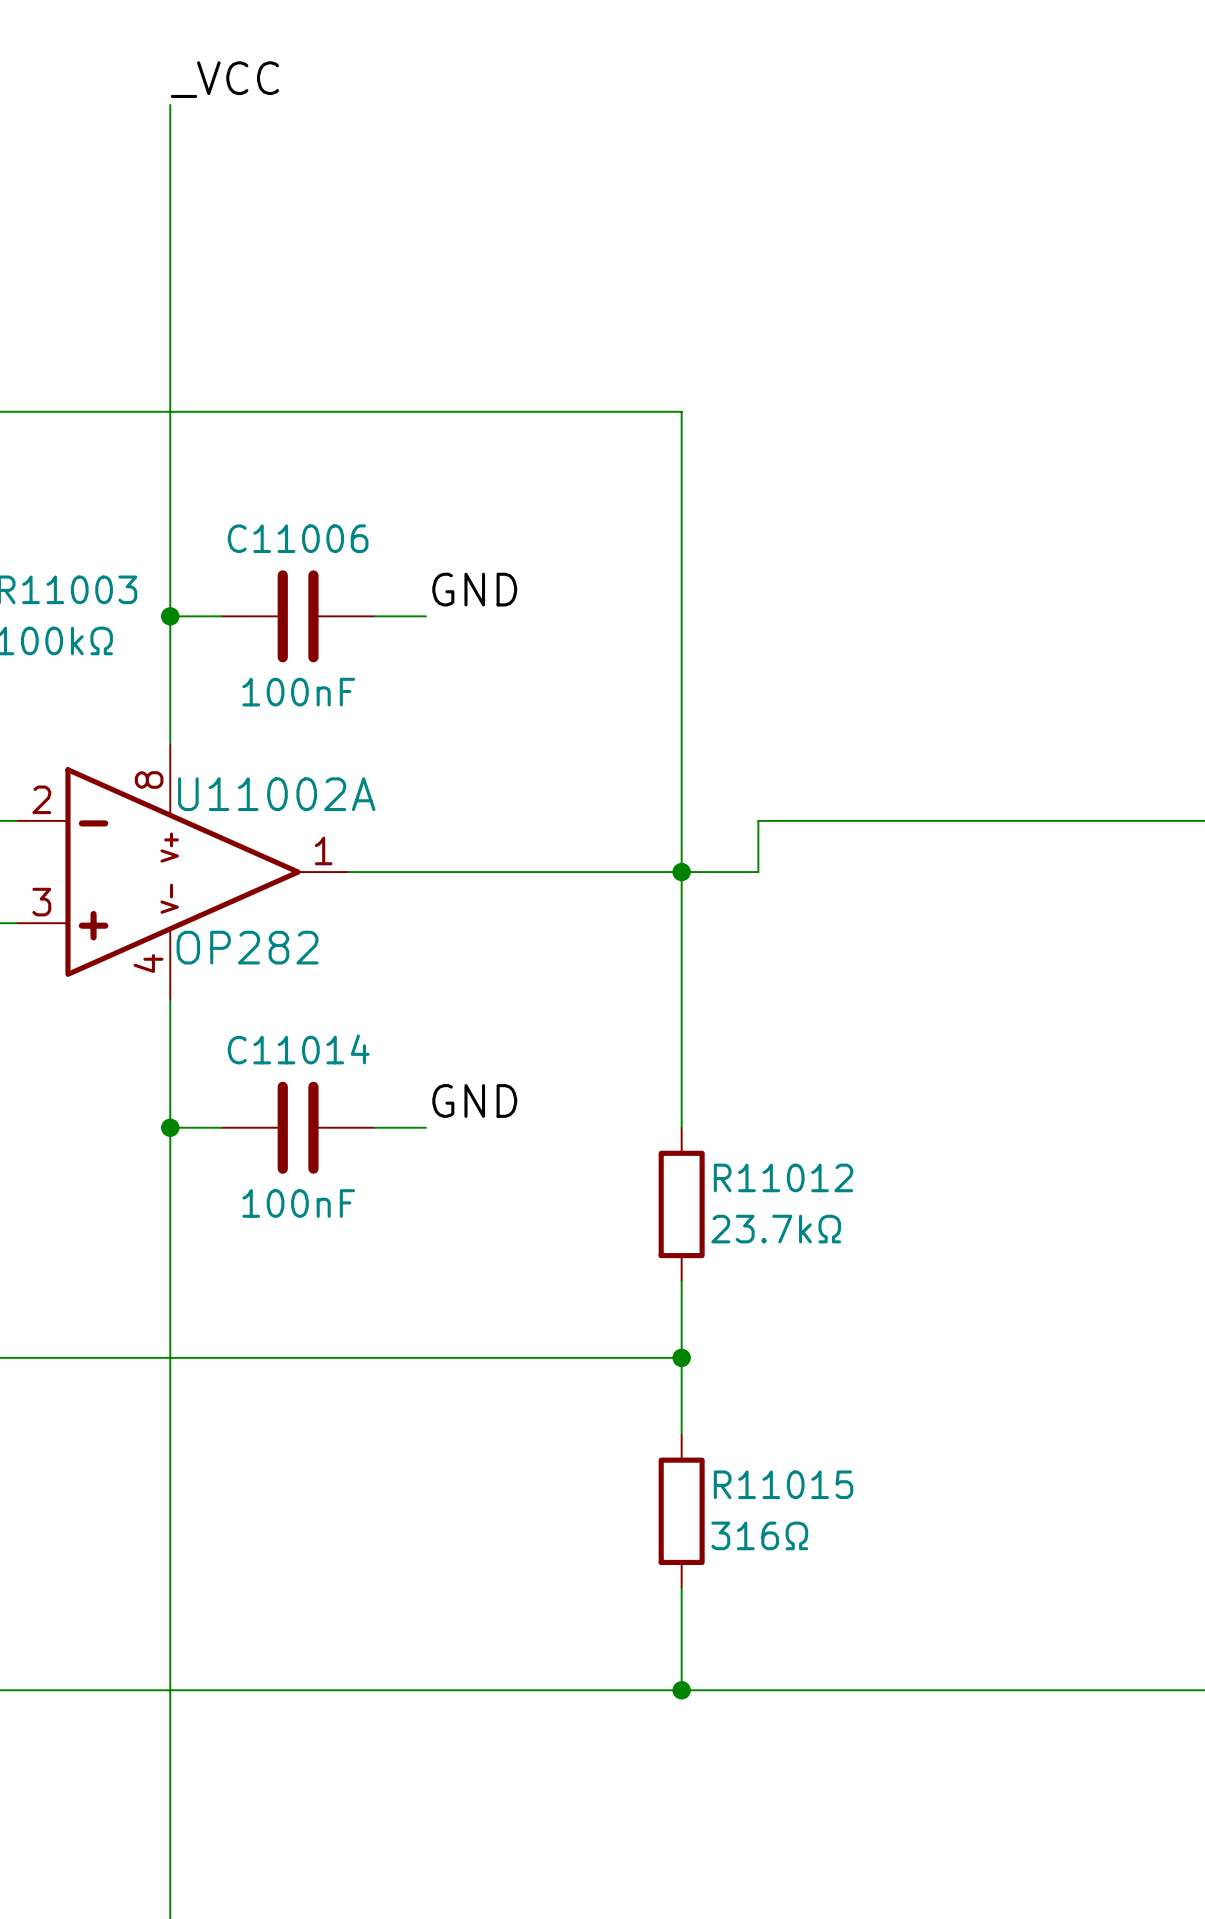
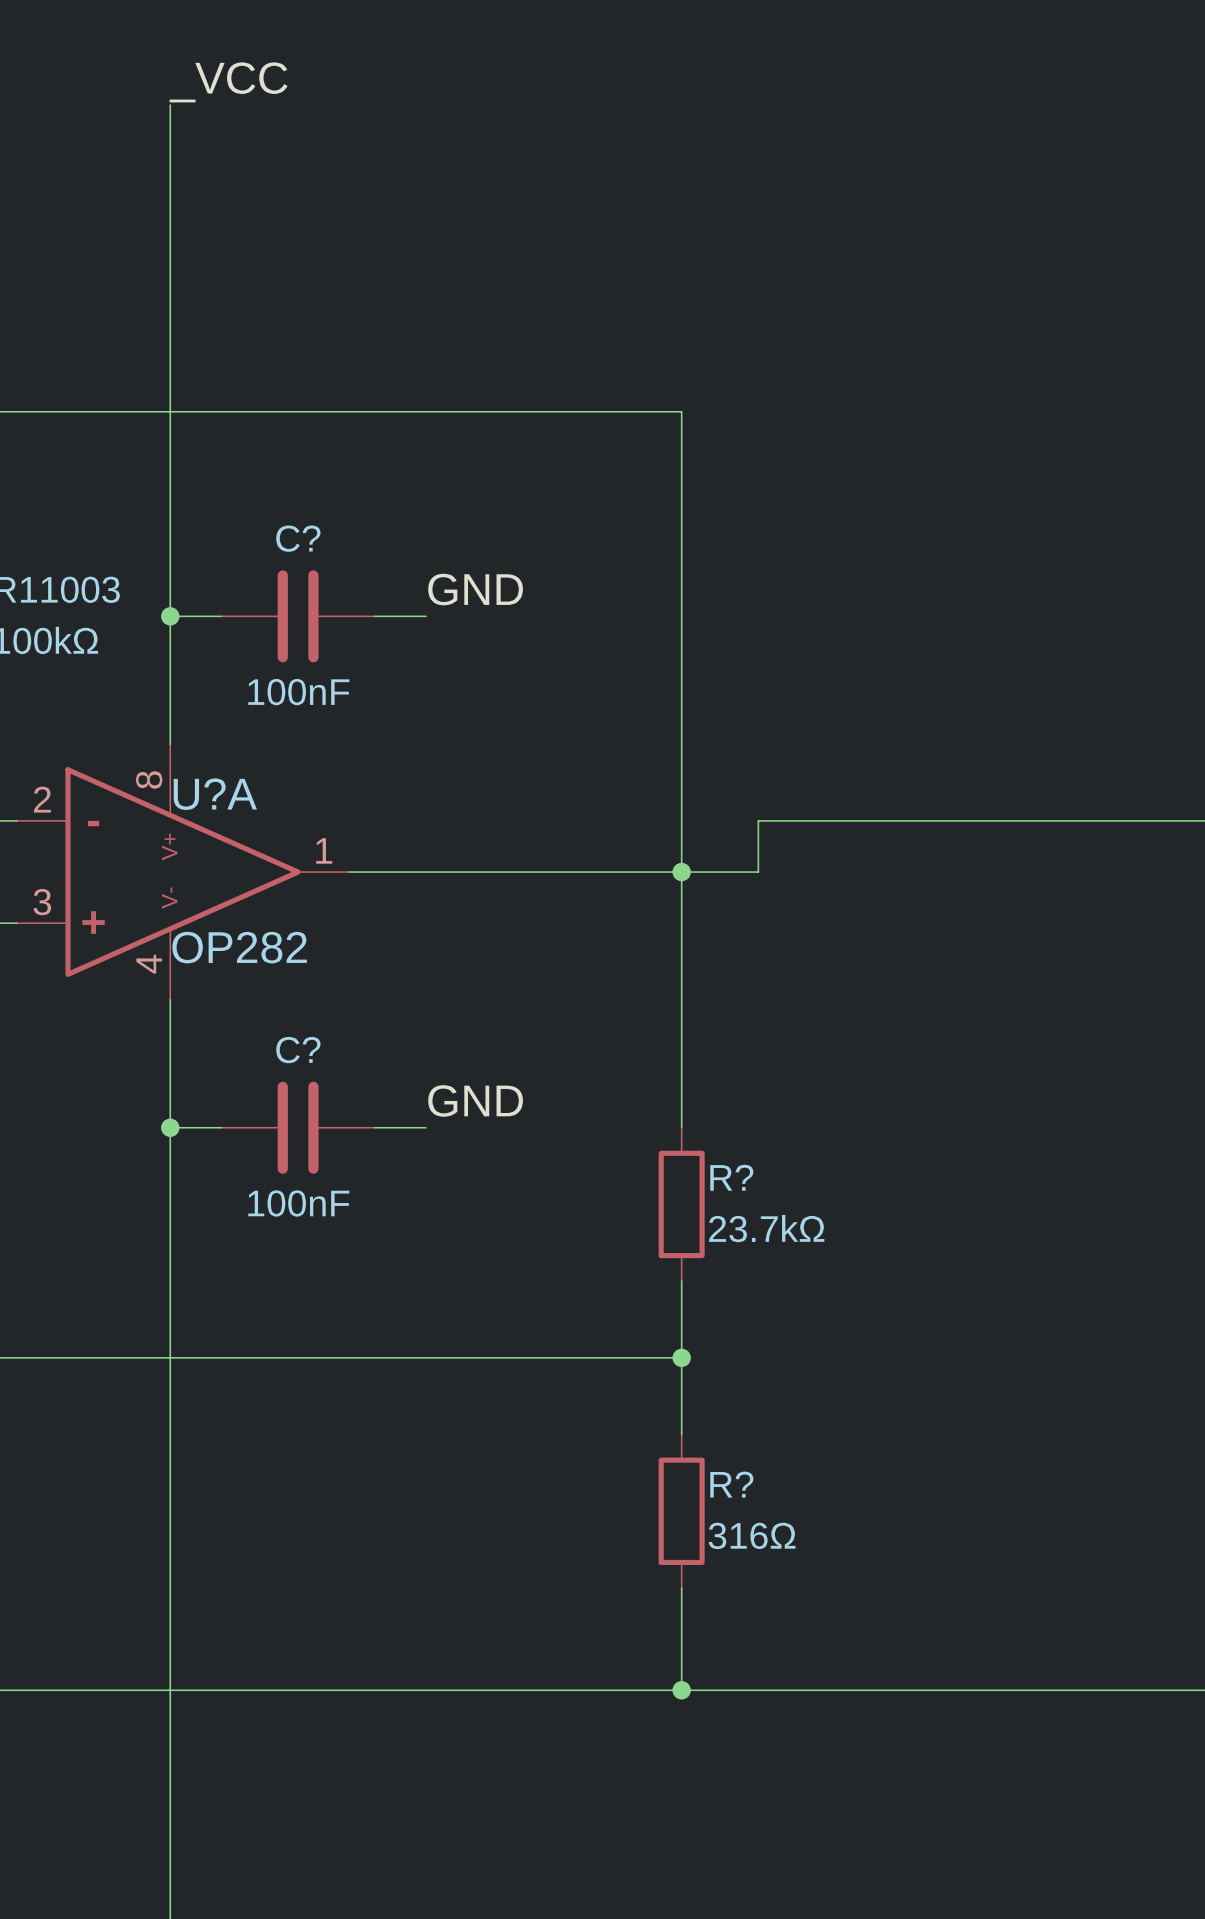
C11006 name: C11006 (298, 538) -> C? (298, 538)
U11002A name: U11002A (276, 794) -> U?A (215, 794)
C11014 name: C11014 (298, 1049) -> C? (298, 1050)
R11012 name: R11012 (783, 1177) -> R? (731, 1177)
R11015 name: R11015 (783, 1484) -> R? (731, 1484)

